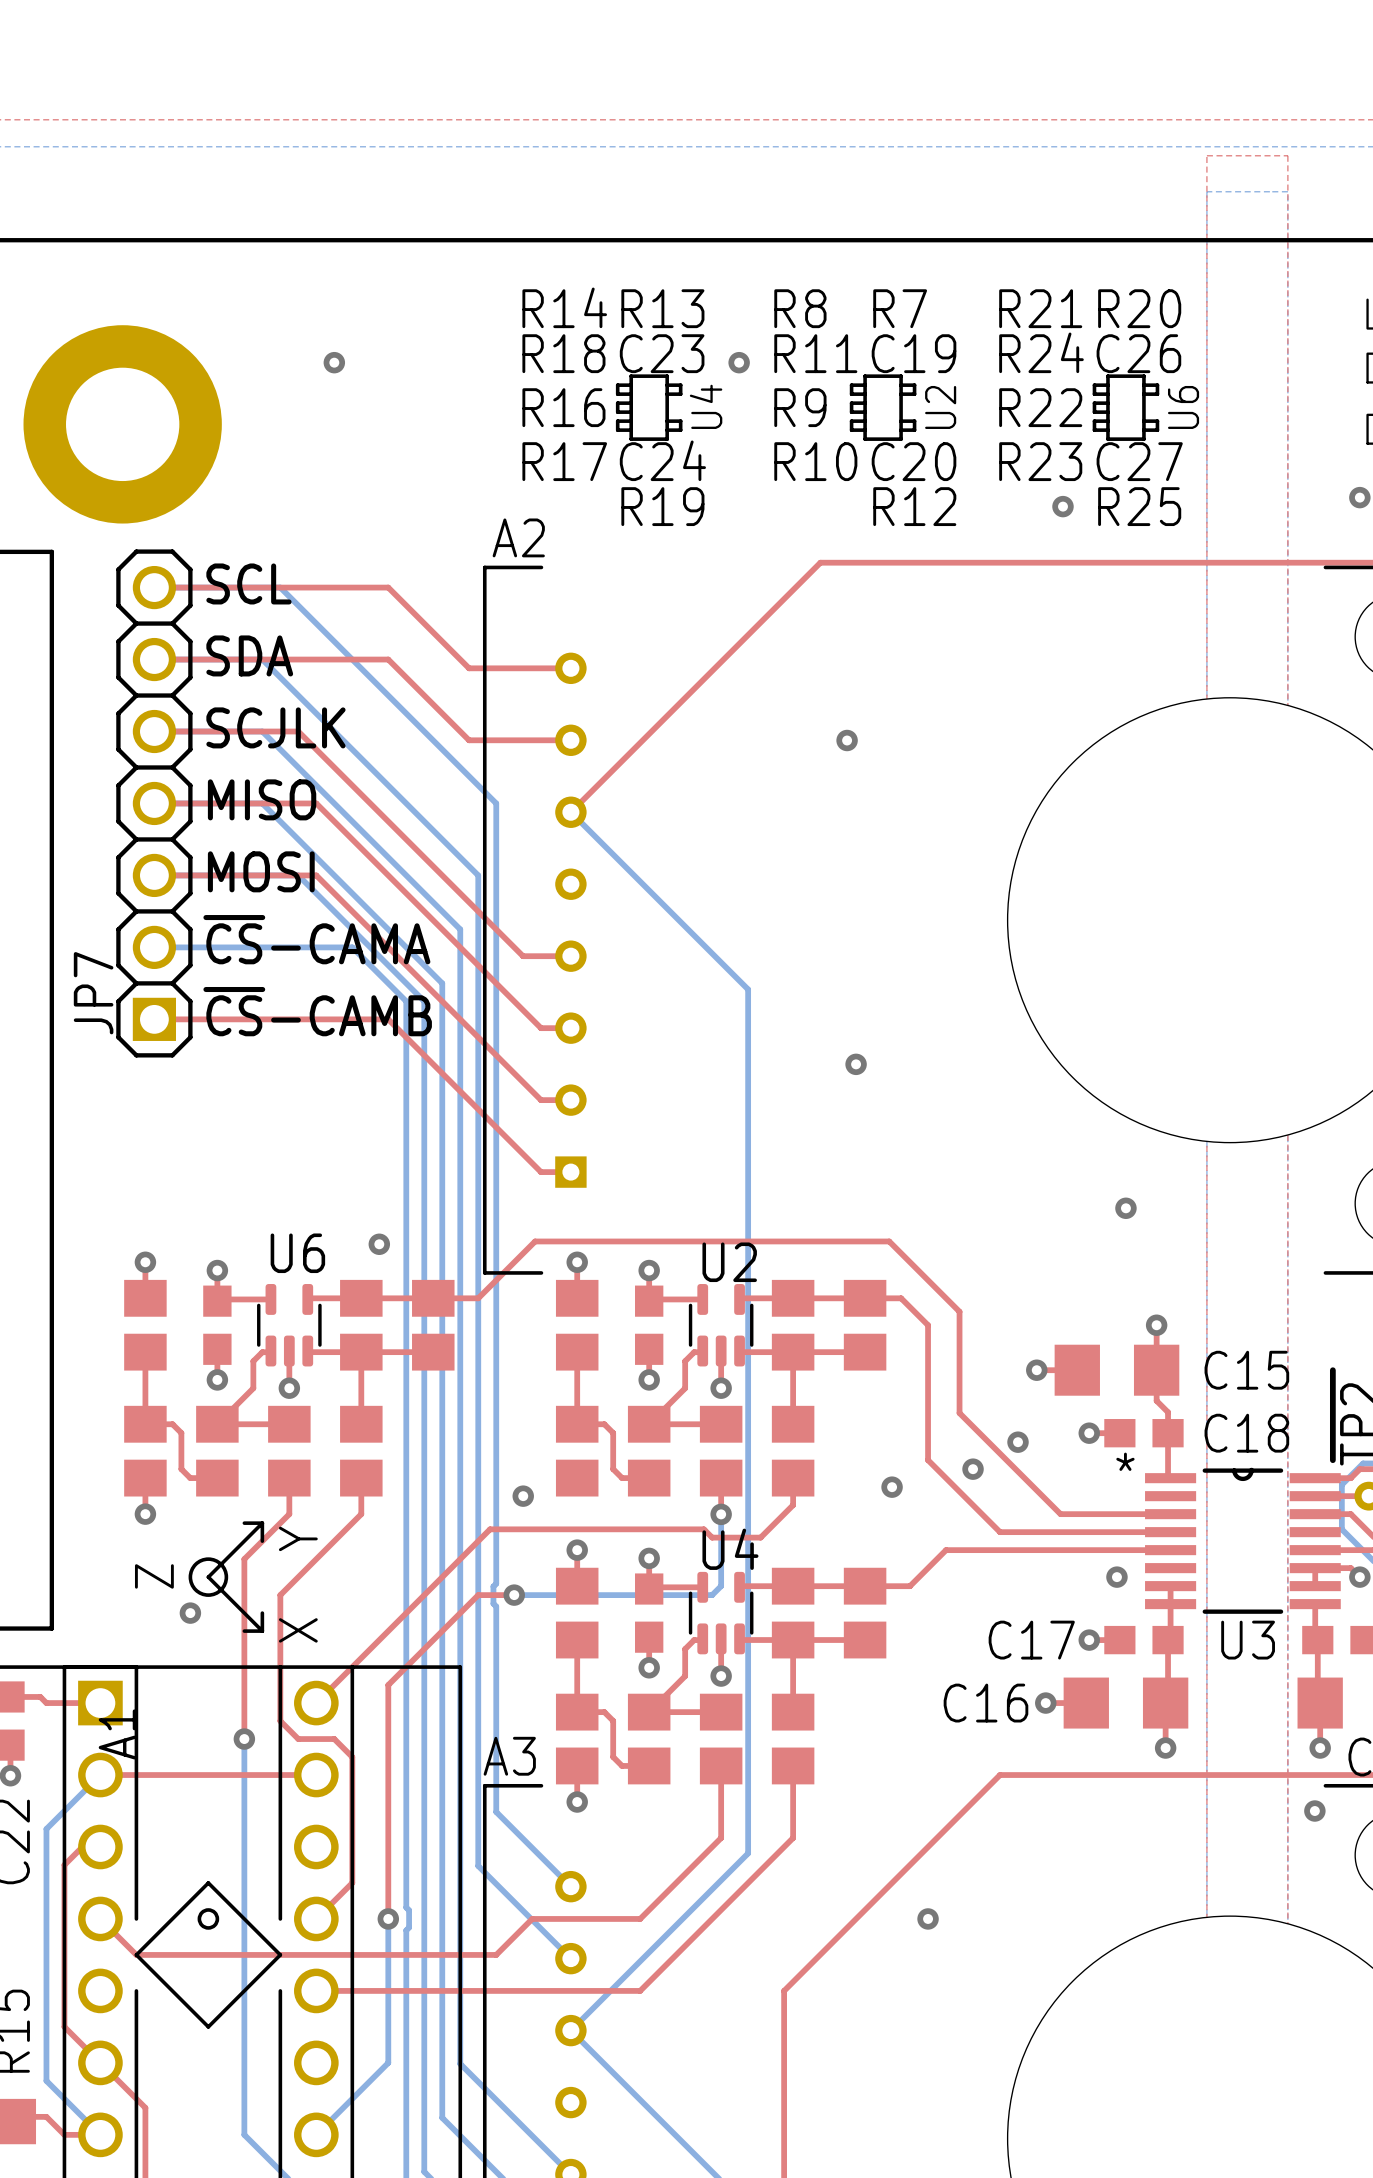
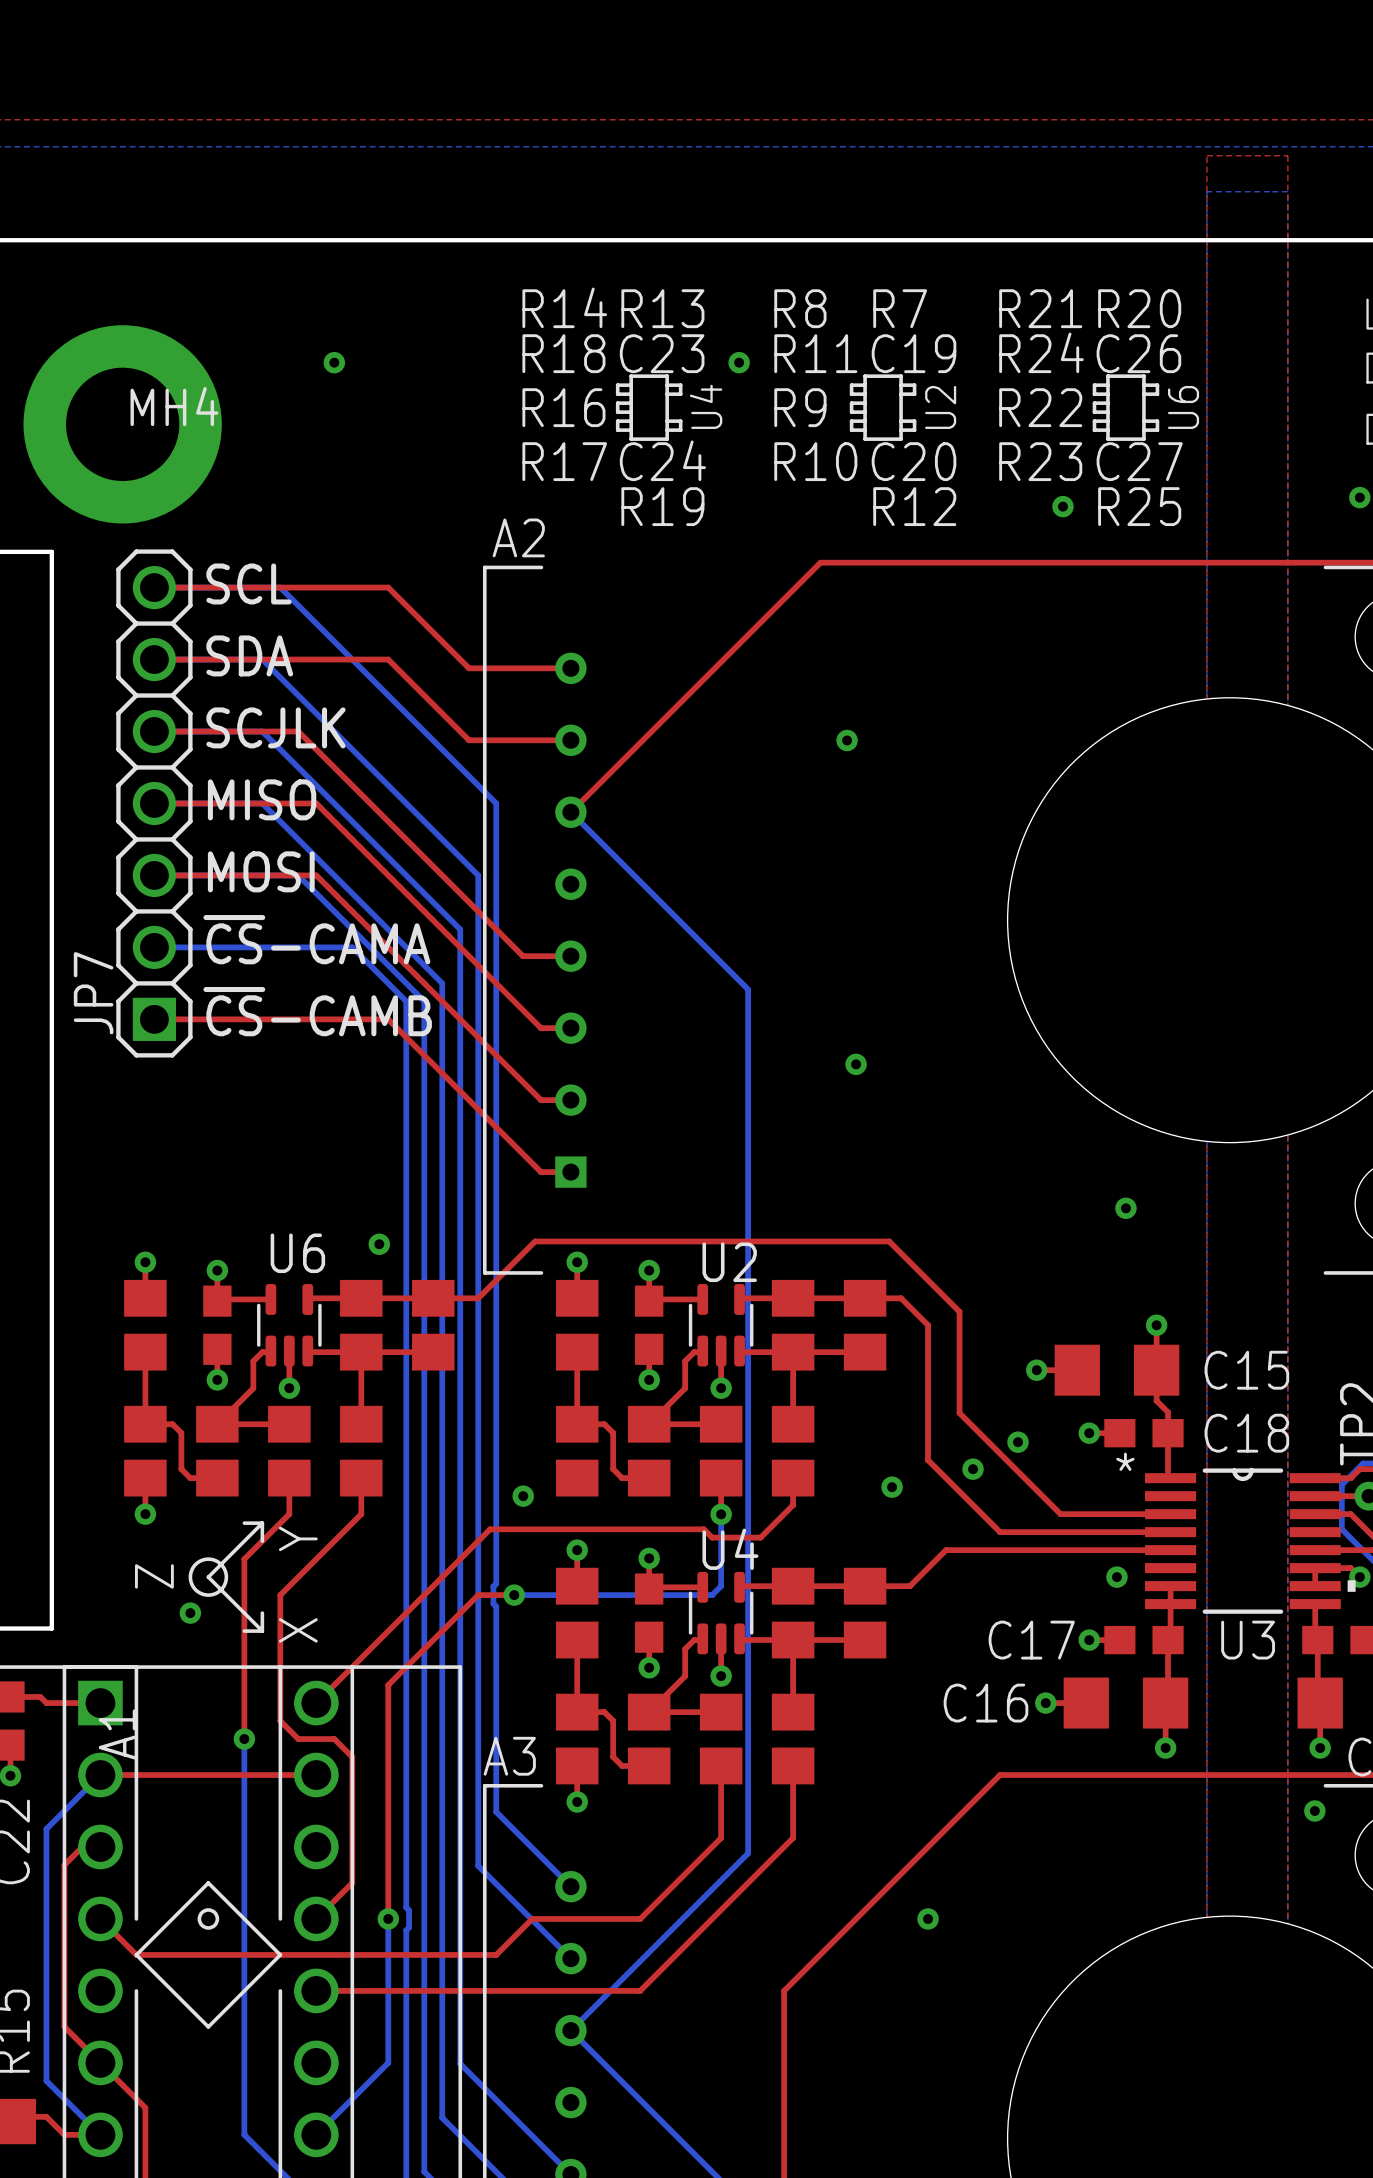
MH4 name: none -> MH4 (174, 406)
line: (1332, 1370) (1332, 1460) -> none
U3 footprint: [1145, 1467, 1341, 1614] -> [1145, 1467, 1356, 1614]

